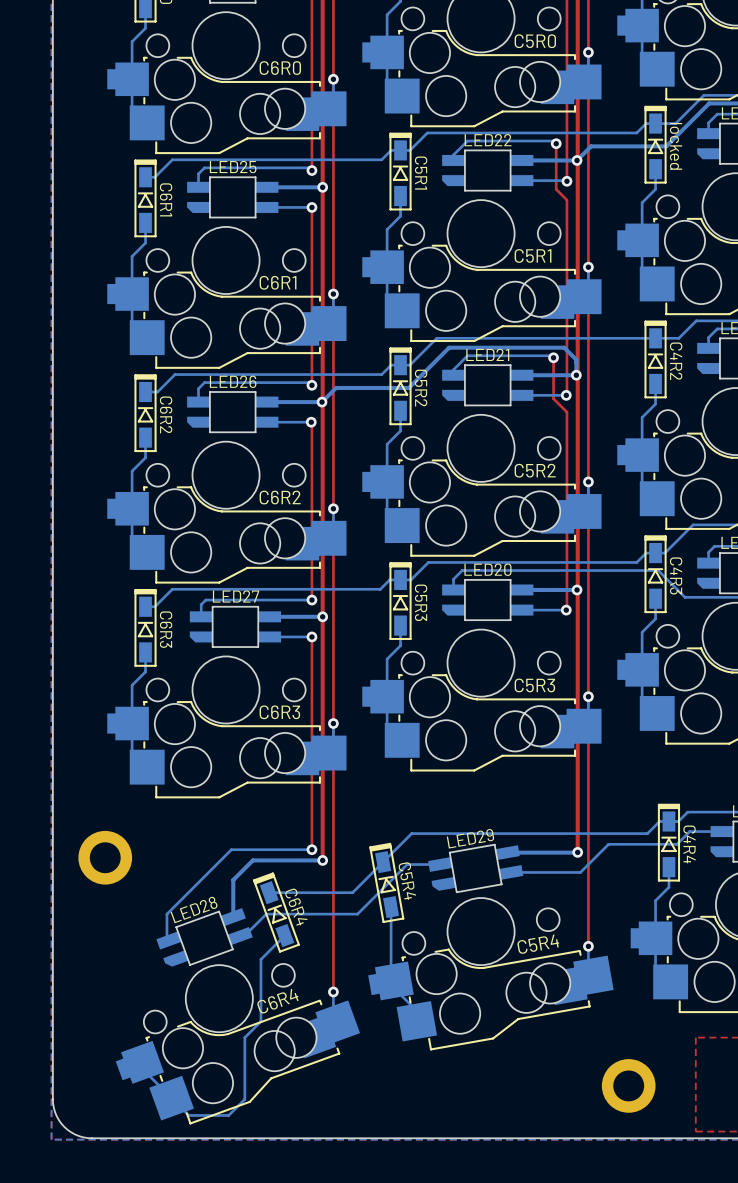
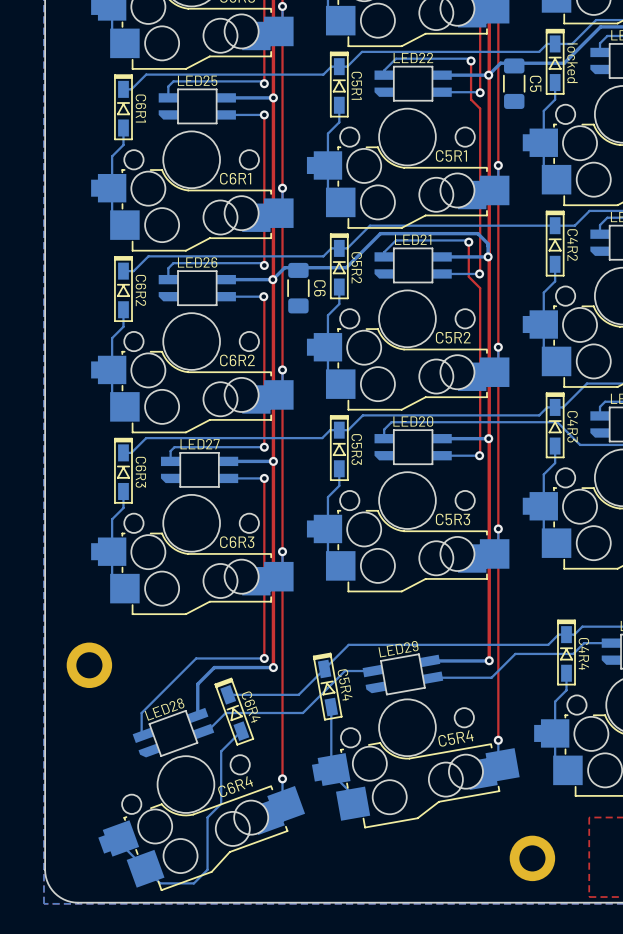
C5: none -> (514, 83)
C6: none -> (298, 288)

